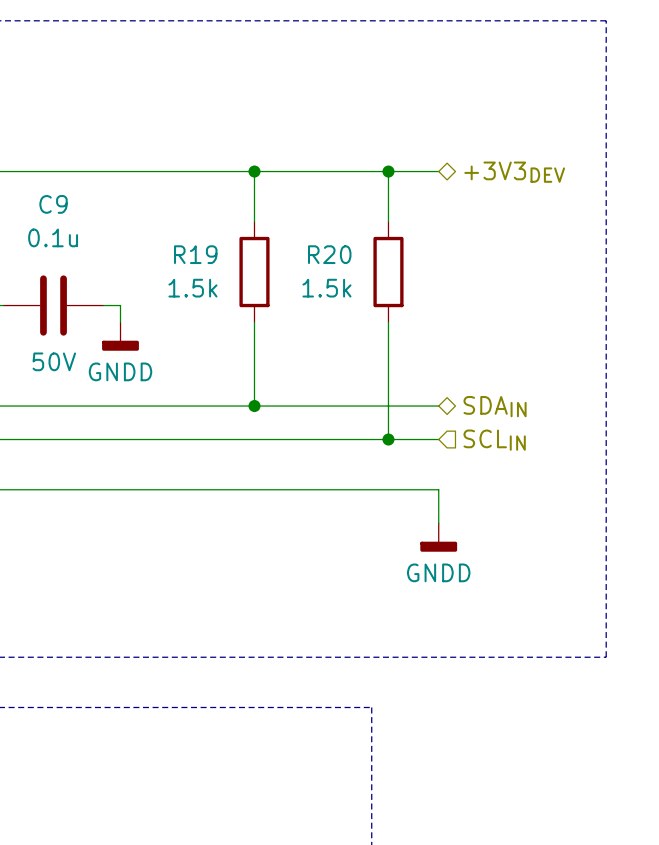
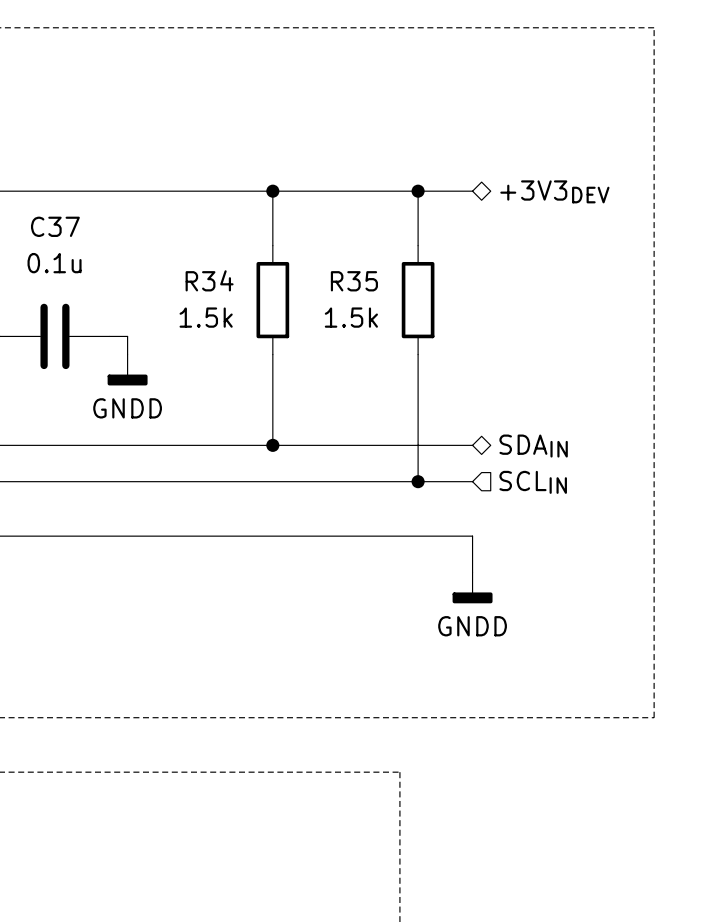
C9 name: C9 (53, 204) -> C37 (55, 226)
R19 name: R19 (195, 254) -> R34 (209, 280)
R20 name: R20 (329, 254) -> R35 (354, 281)
C9 text: 50V (54, 361) -> none

